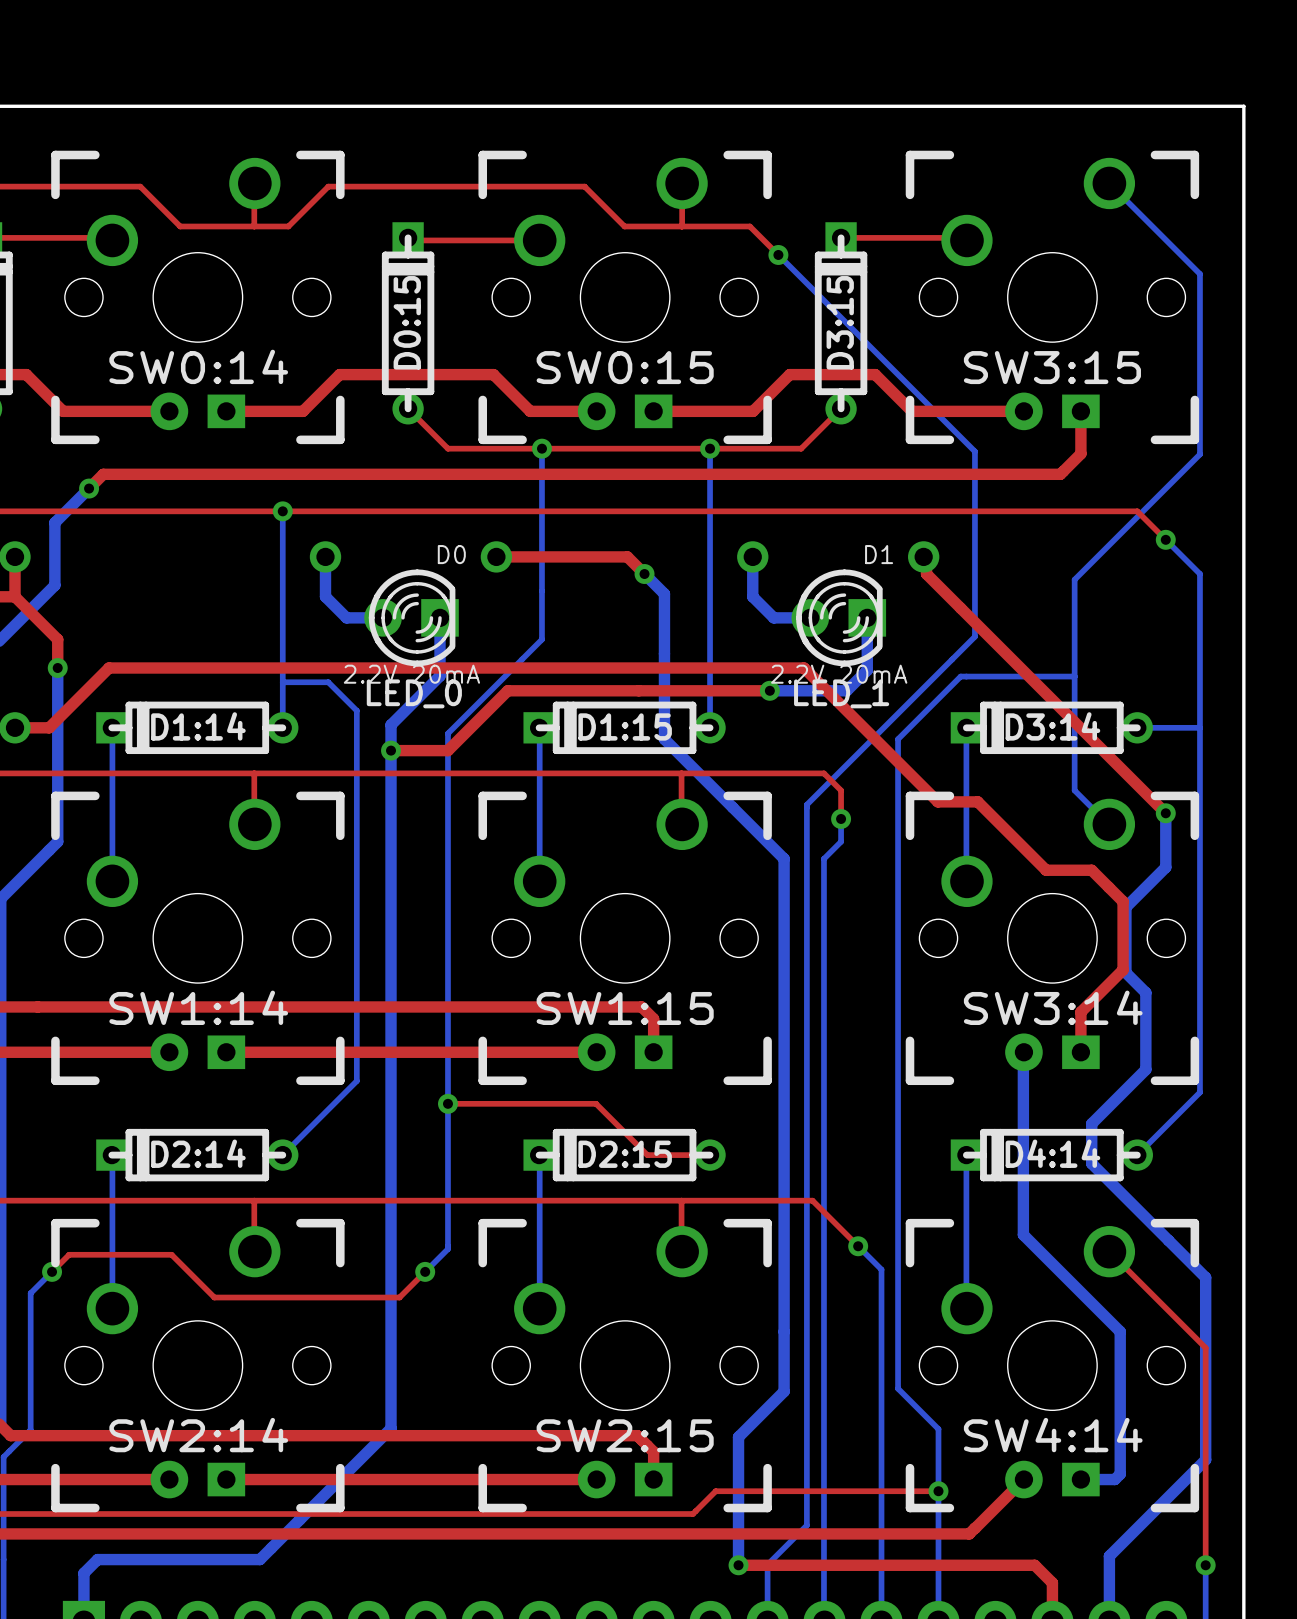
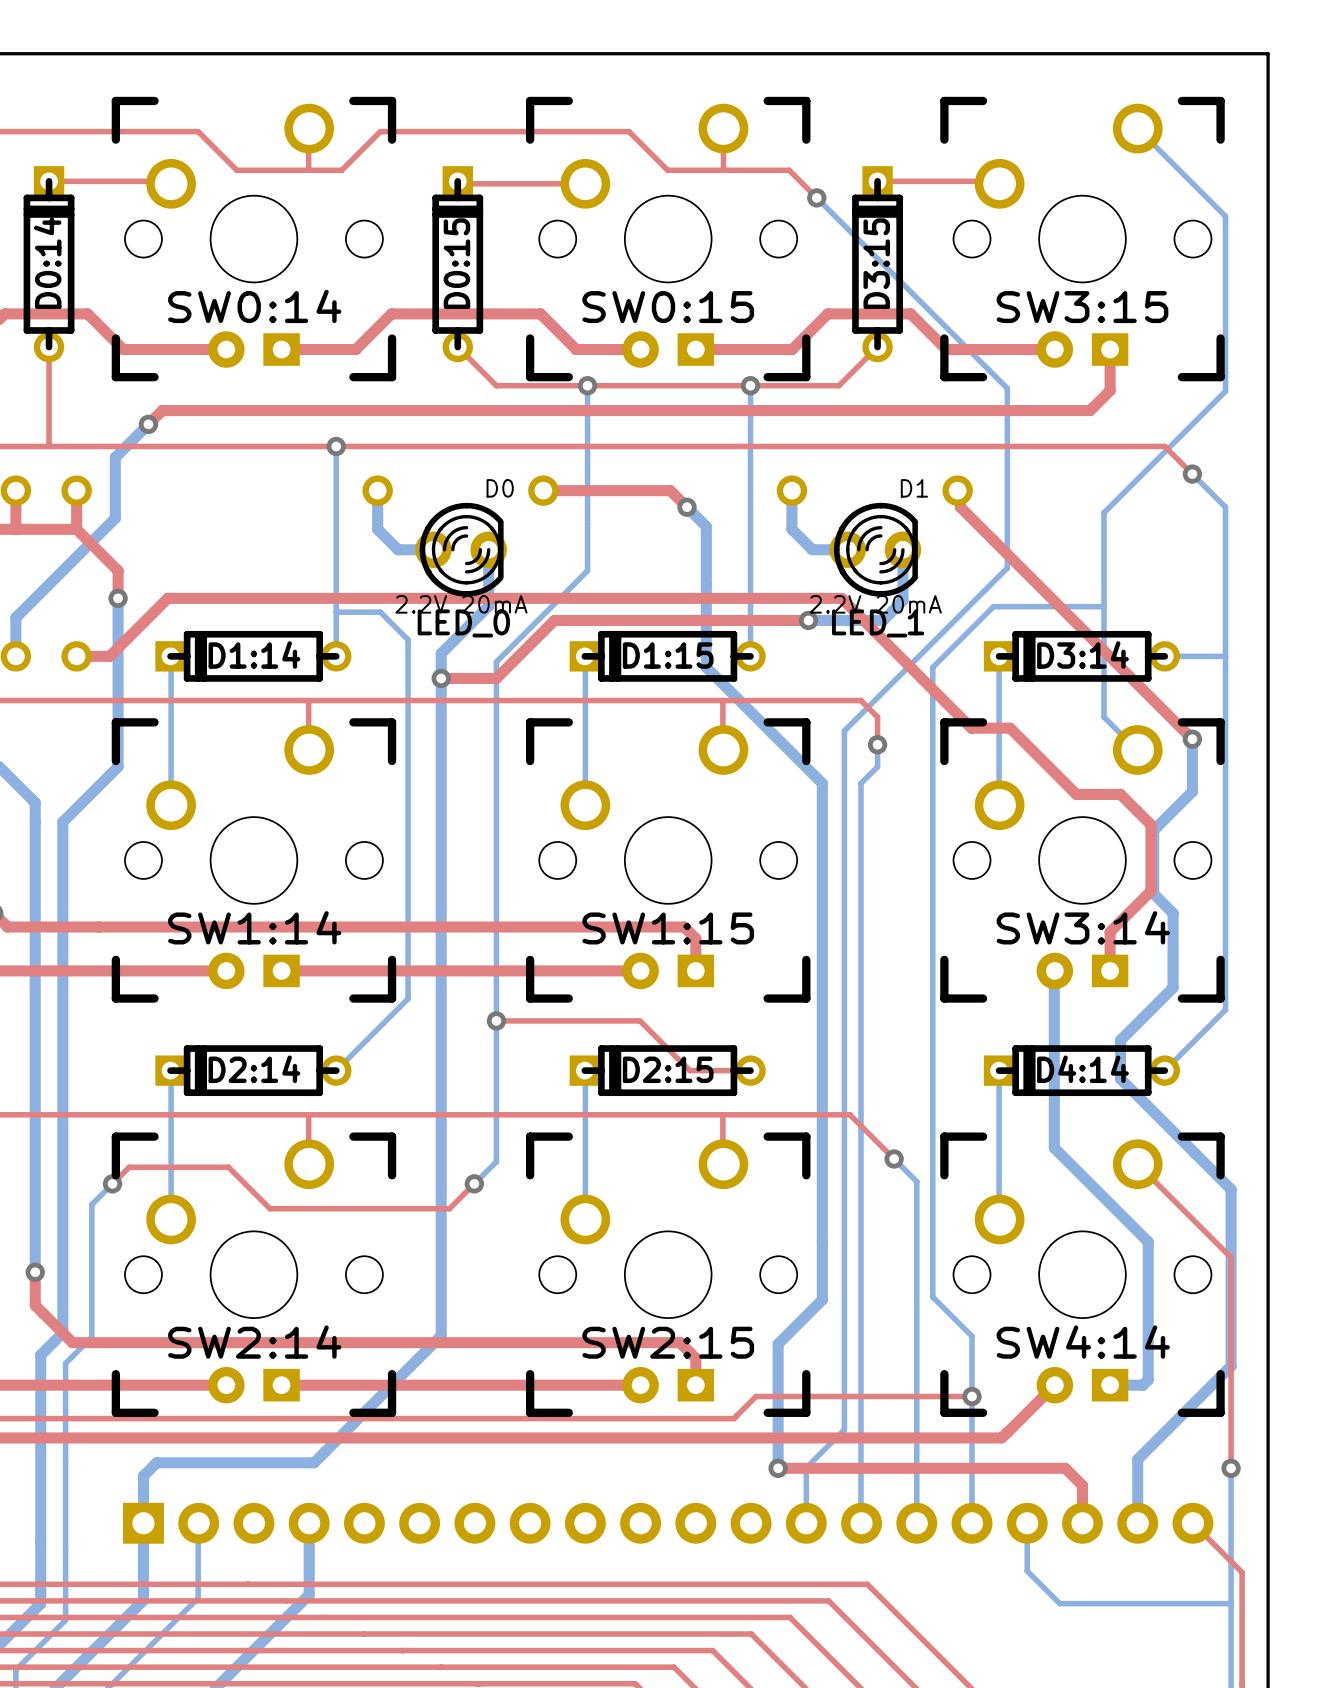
D0 footprint: [364, 569, 459, 667] -> [415, 502, 507, 597]
D1 footprint: [791, 569, 887, 667] -> [829, 502, 922, 597]

